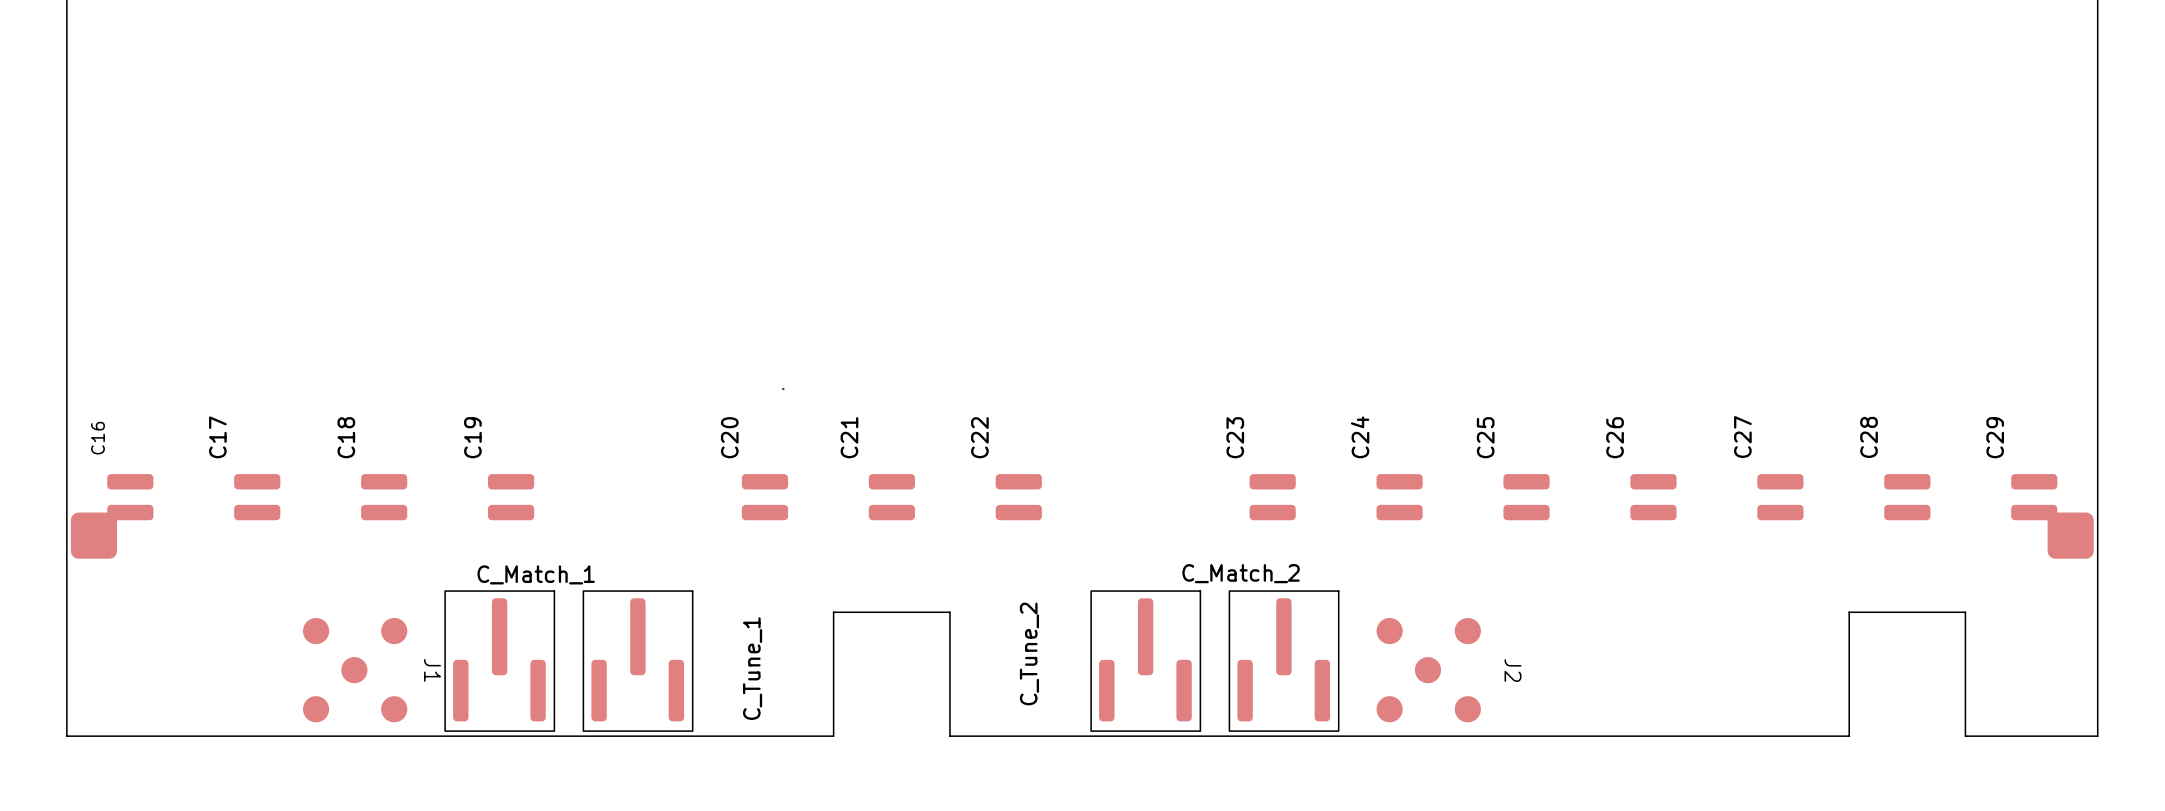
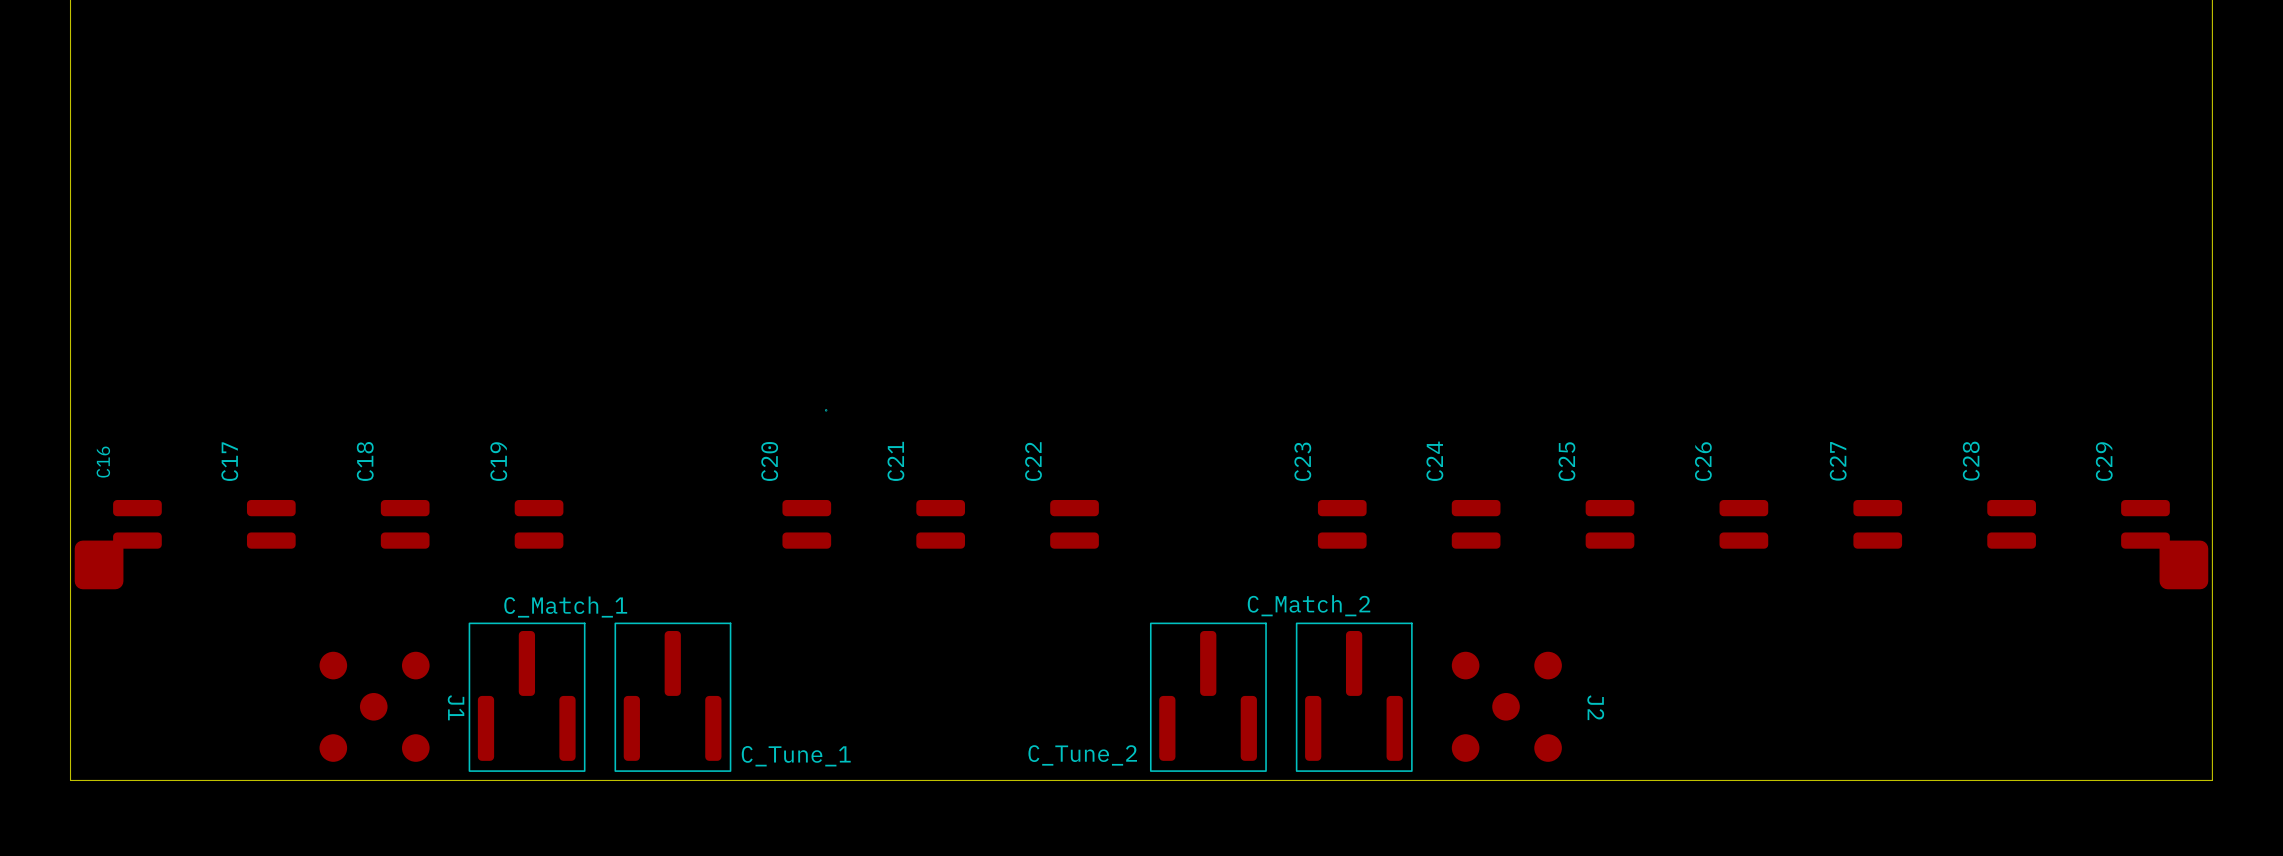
C_Match_1 footprint: [444, 590, 556, 732] -> [468, 622, 586, 772]
C_Tune_1 footprint: [582, 590, 694, 732] -> [614, 622, 732, 772]
C_Tune_2 footprint: [1090, 590, 1202, 732] -> [1149, 622, 1267, 772]
C_Match_2 footprint: [1228, 590, 1340, 732] -> [1295, 622, 1413, 772]
C_Tune_2 name rotation: 0° (1029, 653) -> 90° clockwise (1082, 755)
C_Tune_1 name rotation: 0° (752, 668) -> 90° clockwise (796, 756)
board edge: (66, 736) (833, 736) (833, 612) (949, 612) (949, 736) (1849, 736) (1849, 612) (1965, 612) (1965, 736) (2097, 736) -> (70, 776) (70, 780) (2212, 780) (2212, 776)

